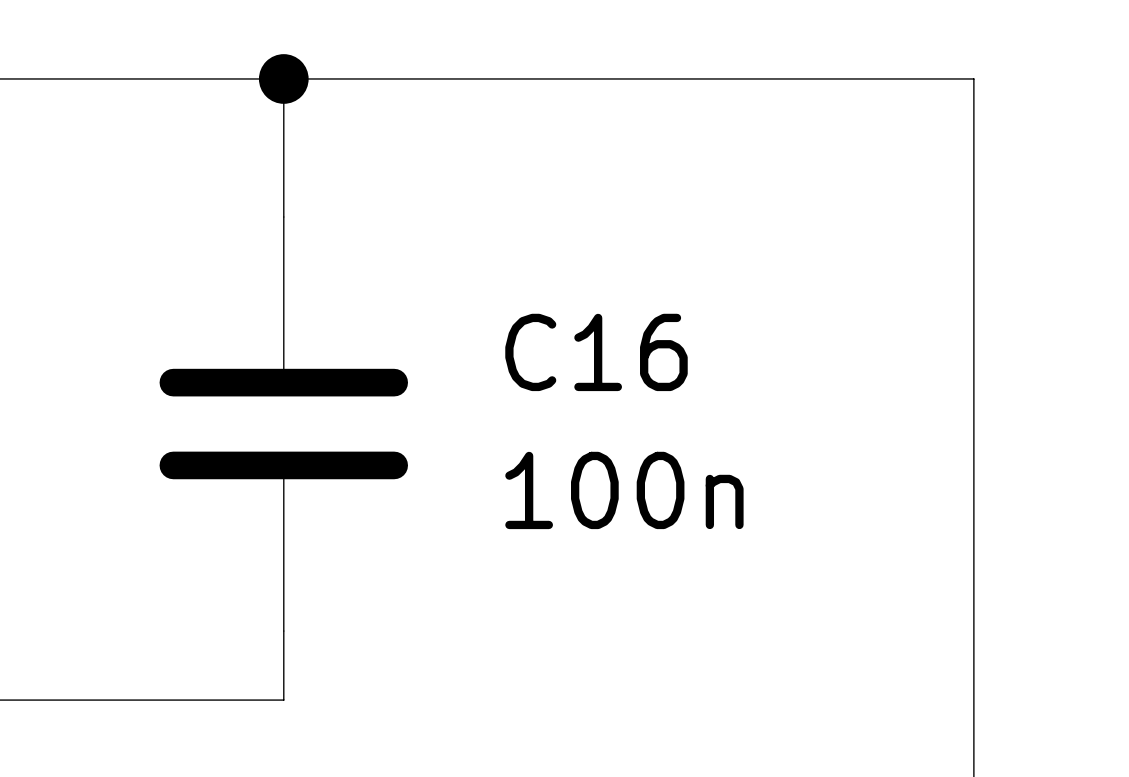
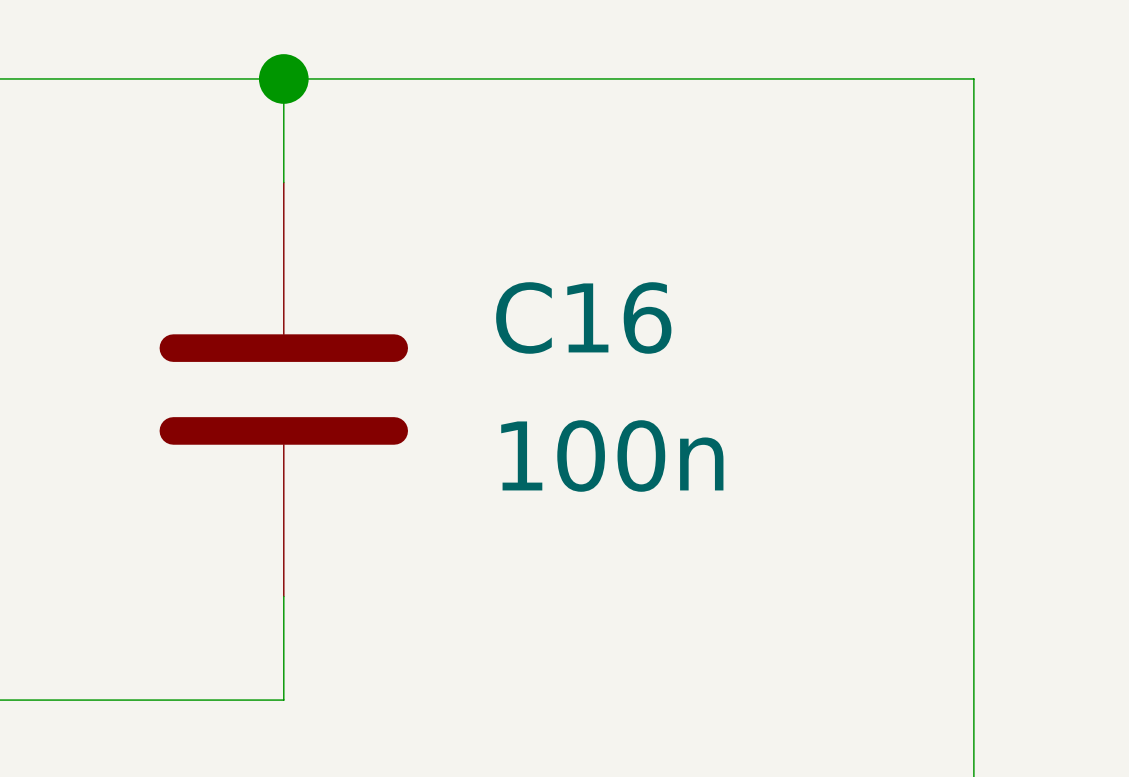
C16 position: (283, 424) -> (283, 389)

